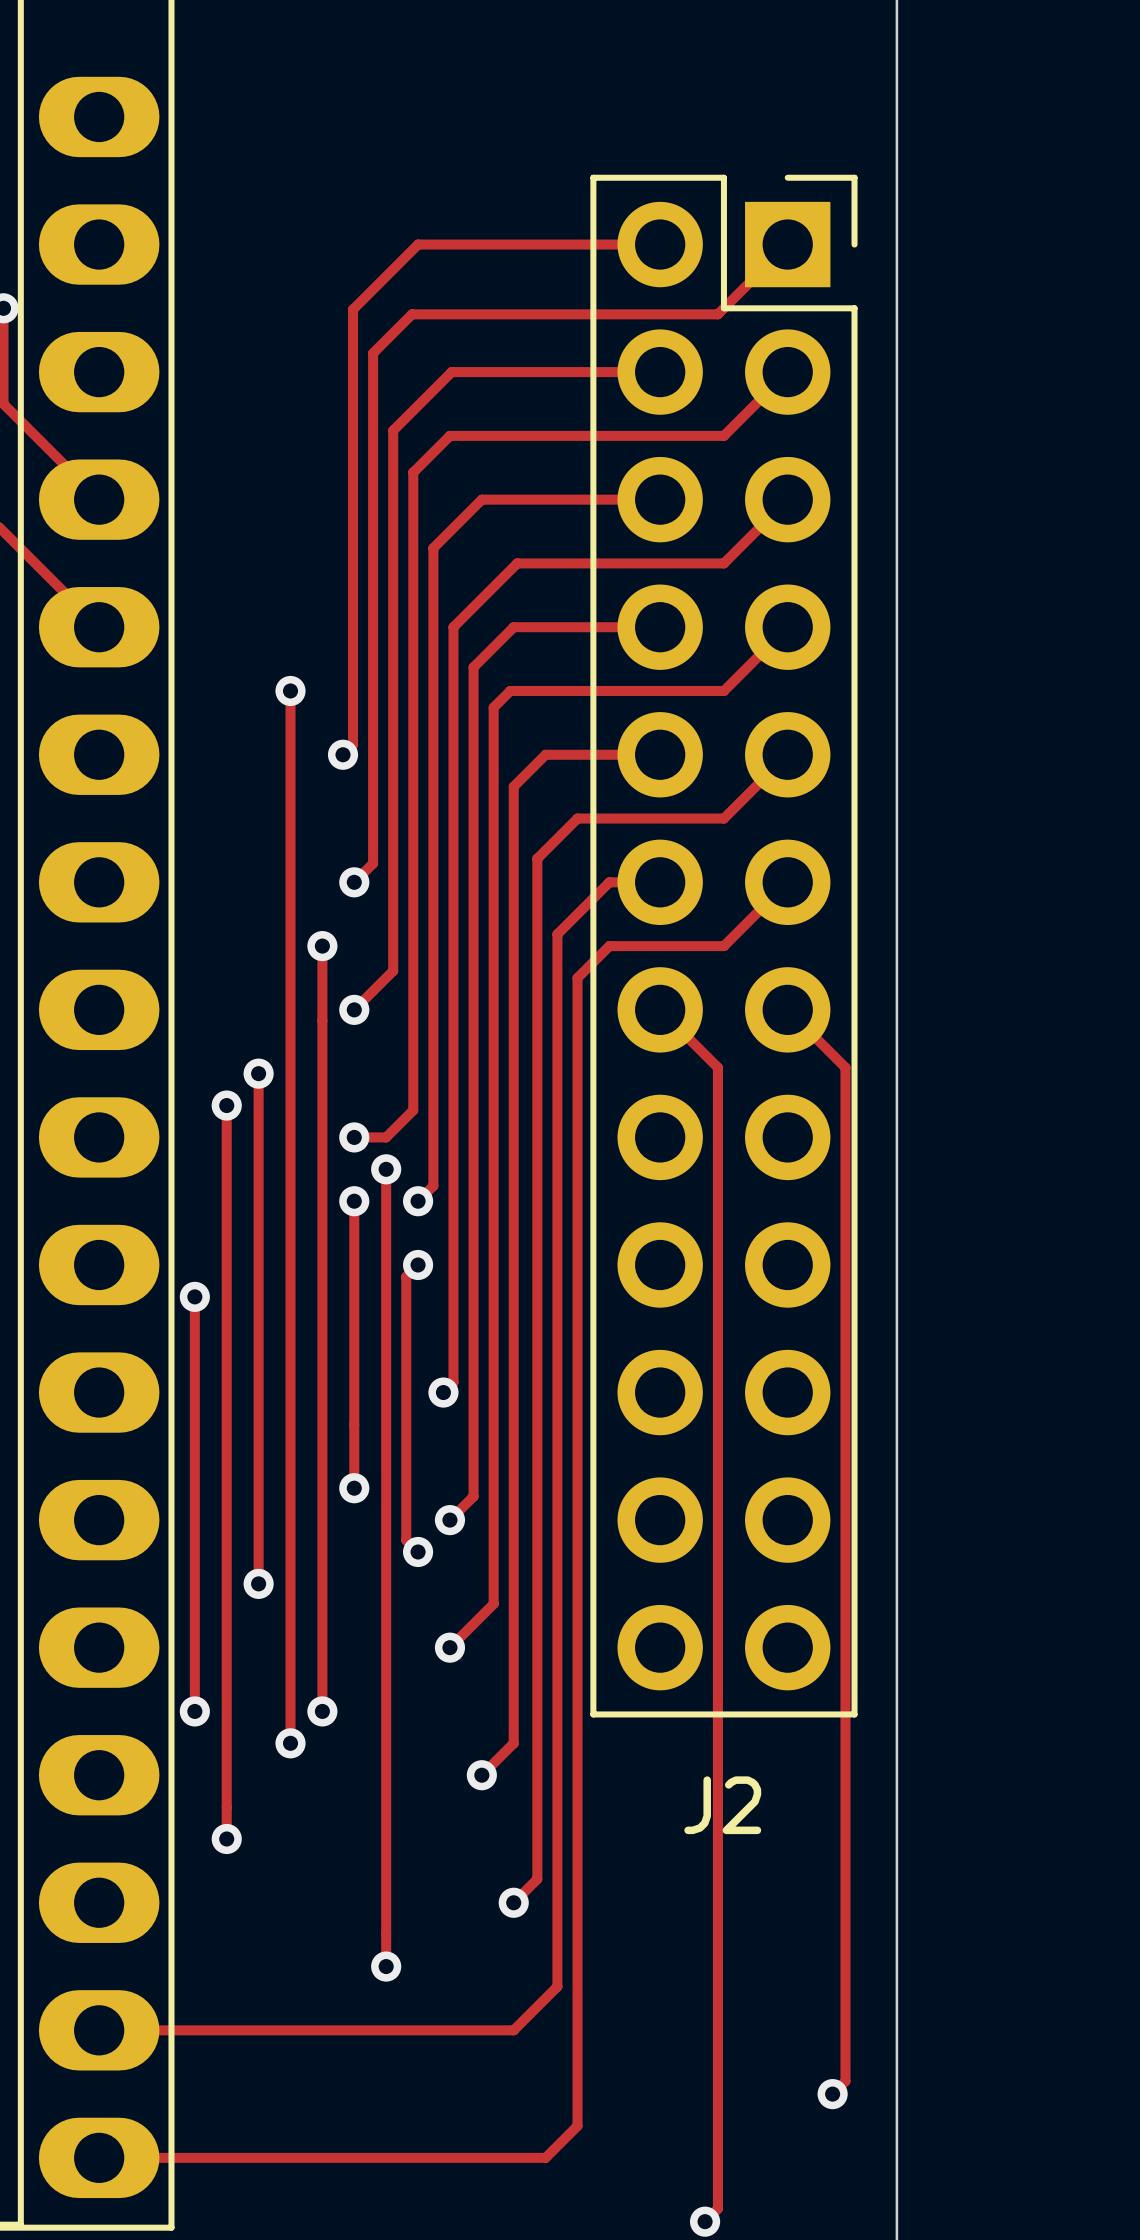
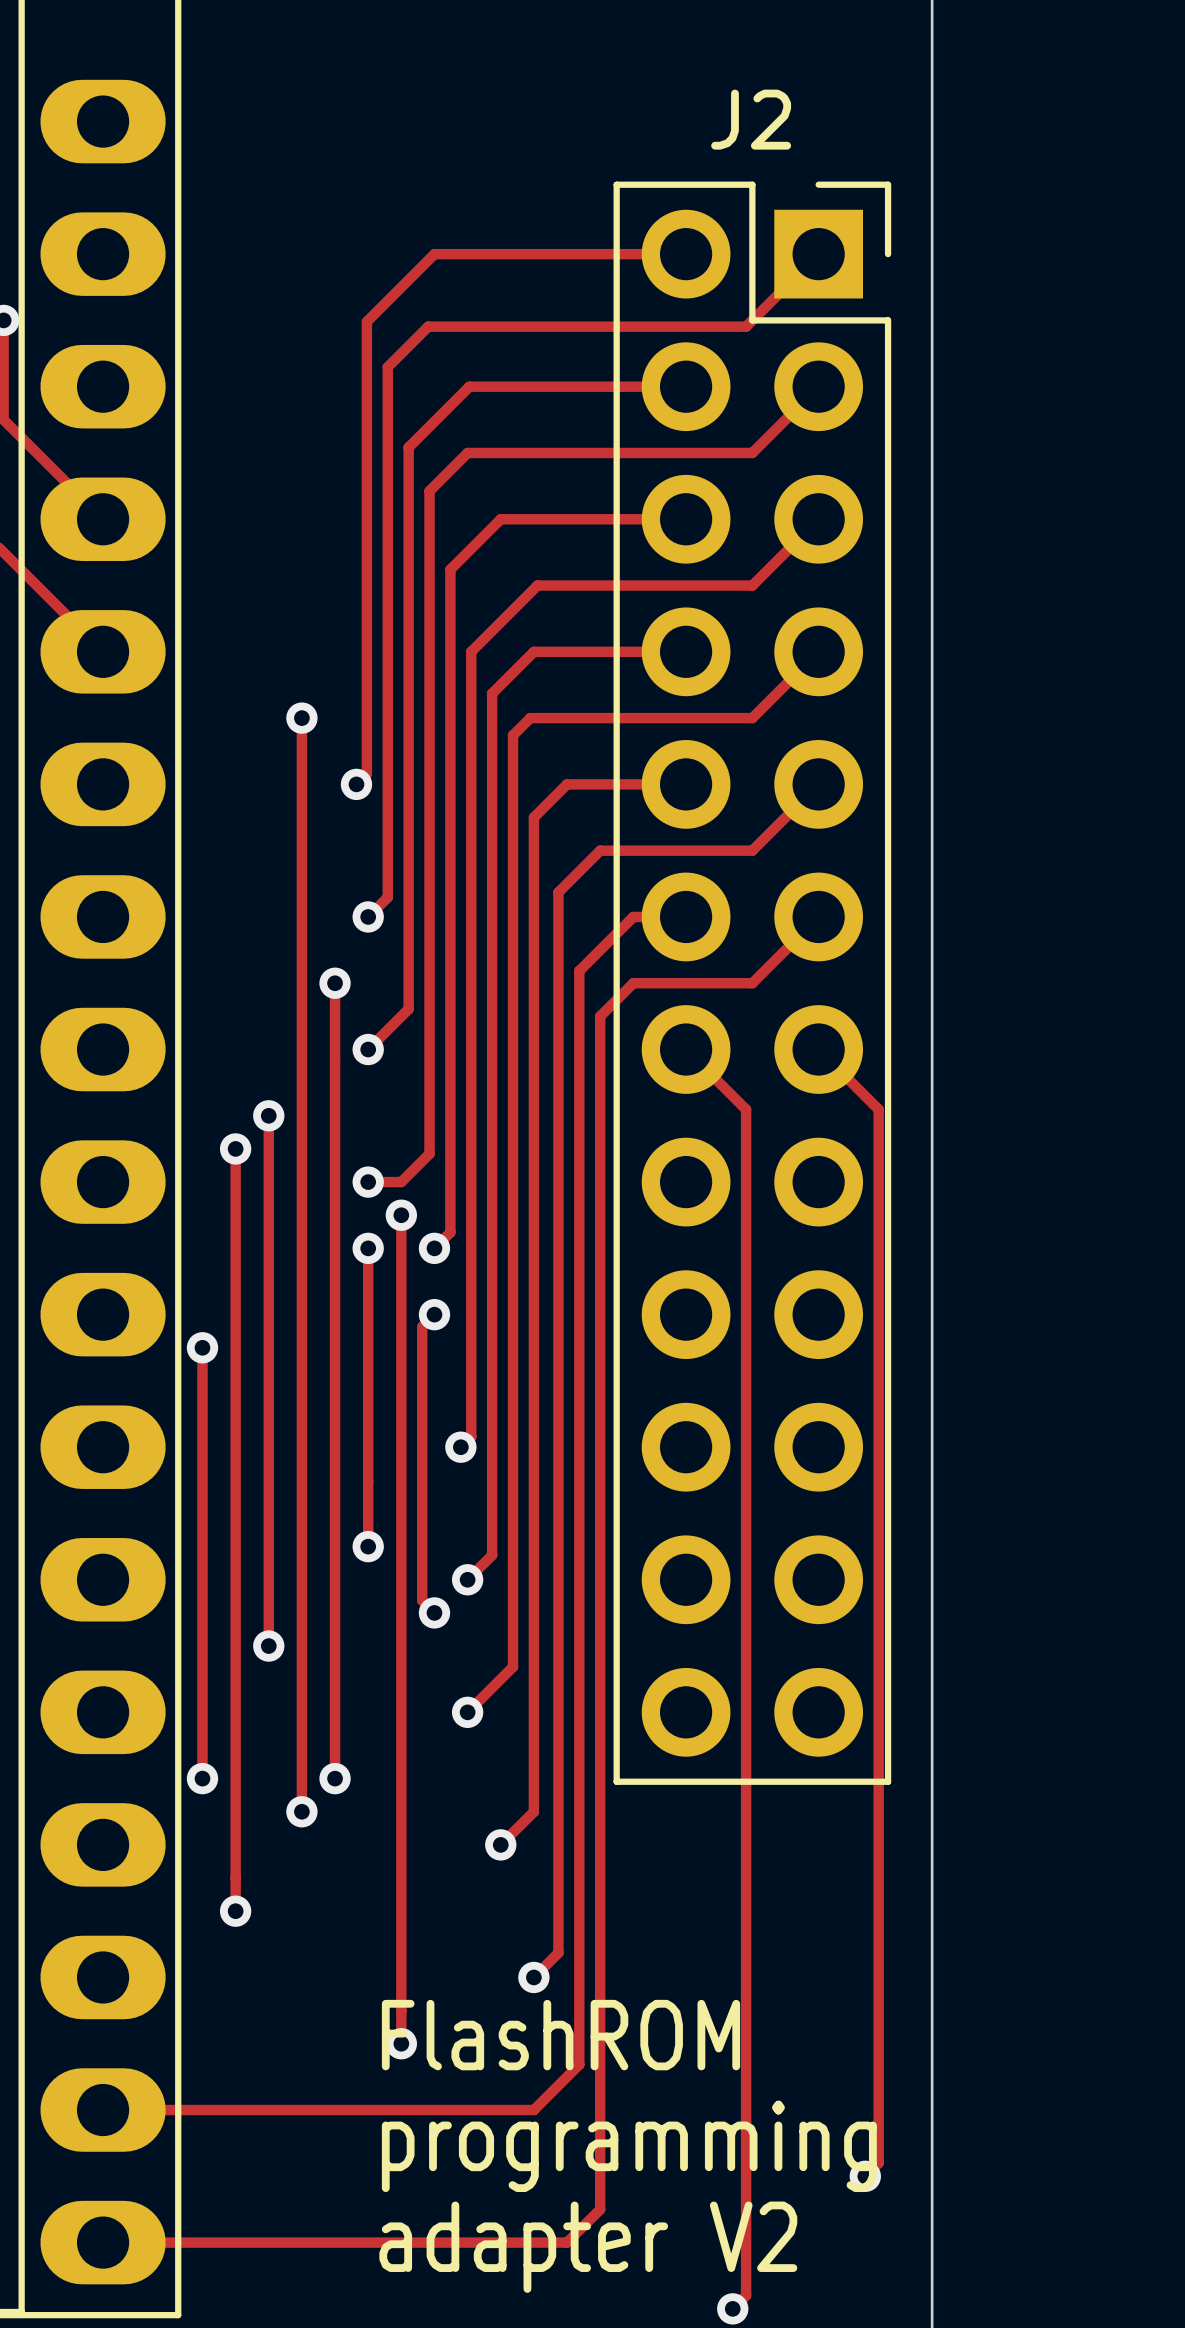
J2 name position: J2 (722, 1805) -> J2 (751, 119)
text: none -> FlashROM (560, 2035)
text: none -> programming (629, 2146)
text: none -> adapter V2 (588, 2247)

